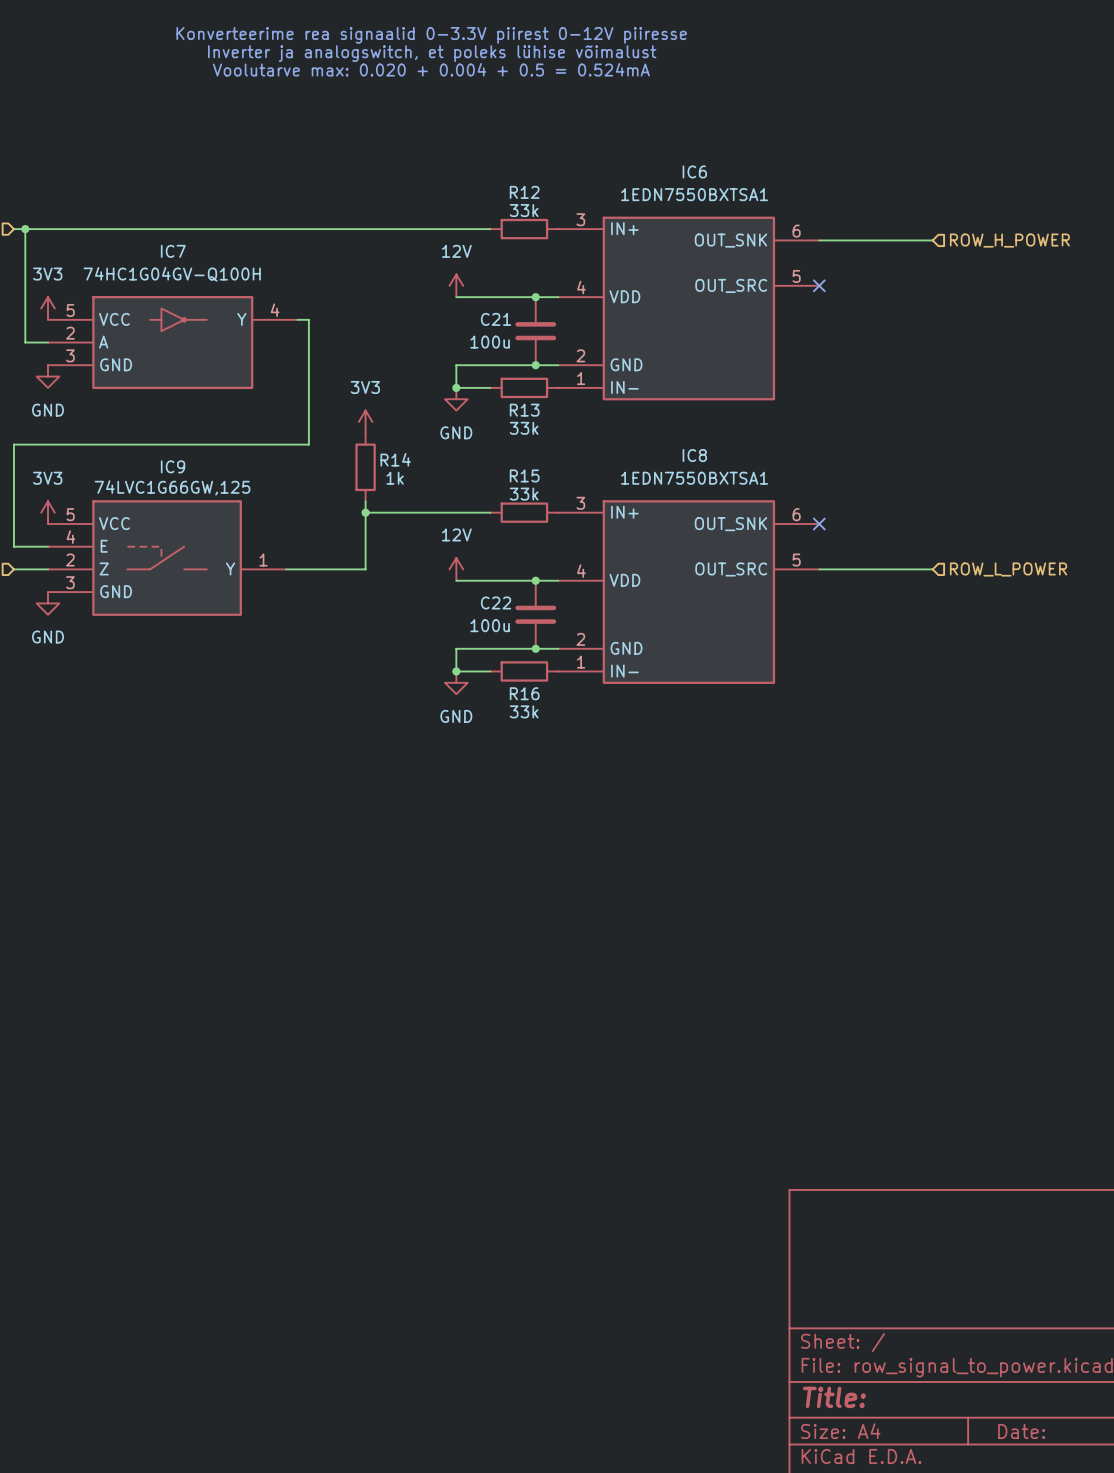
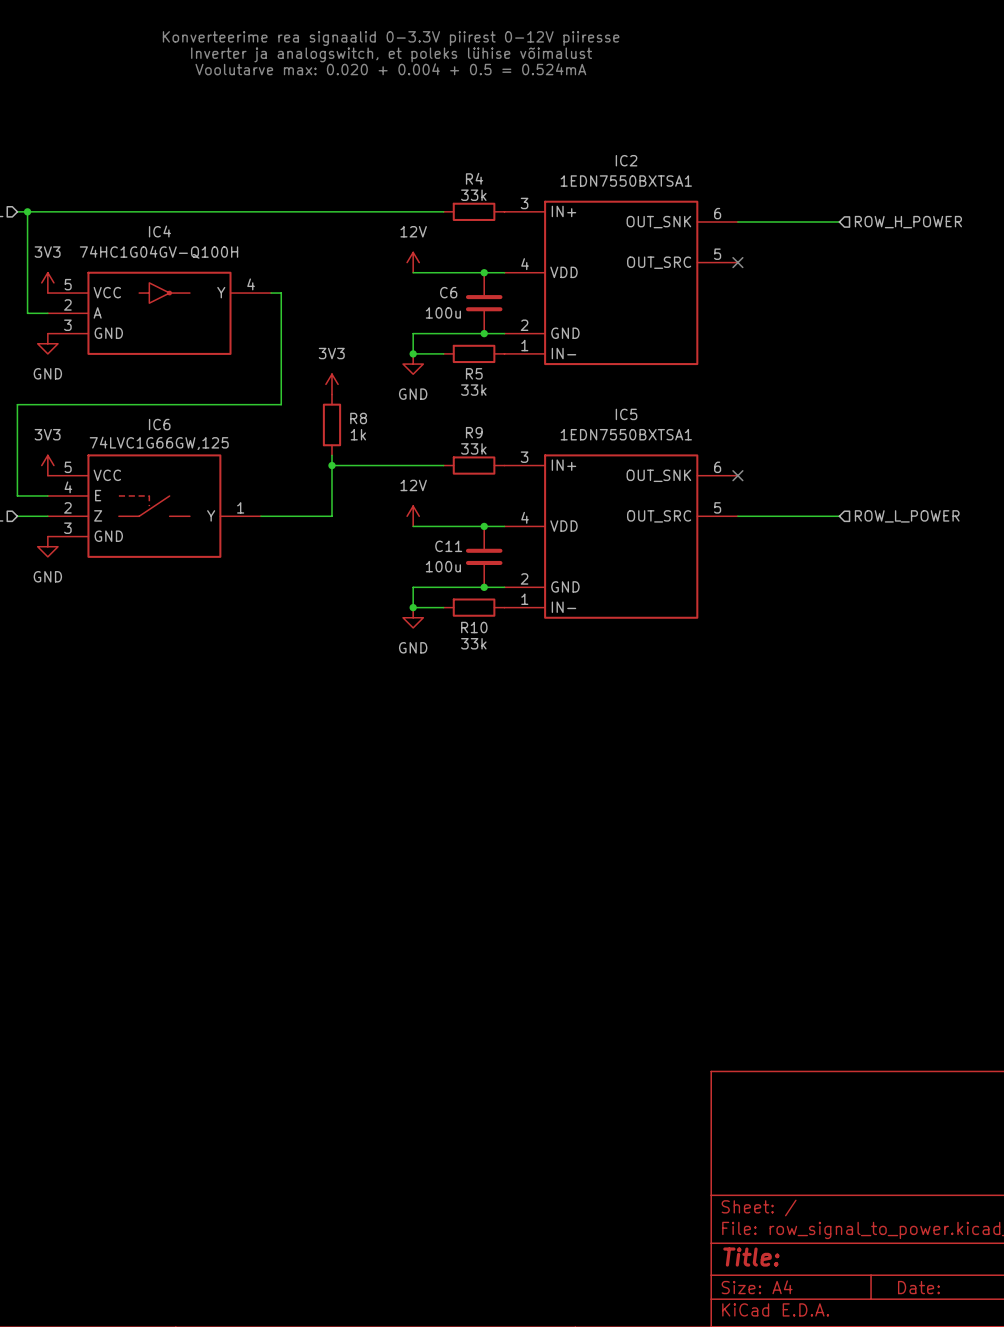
IC6 name: IC6 (694, 171) -> IC2 (626, 160)
R12 name: R12 (524, 192) -> R4 (474, 178)
IC7 name: IC7 (173, 251) -> IC4 (159, 231)
C21 name: C21 (496, 319) -> C6 (448, 292)
R13 name: R13 (524, 410) -> R5 (474, 373)
IC8 name: IC8 (694, 455) -> IC5 (626, 414)
R14 name: R14 (395, 459) -> R8 (358, 418)
IC9 name: IC9 (173, 466) -> IC6 (159, 424)
R15 name: R15 (524, 475) -> R9 (474, 432)
C22 name: C22 (496, 602) -> C11 (448, 546)
R16 name: R16 (524, 693) -> R10 (474, 627)

